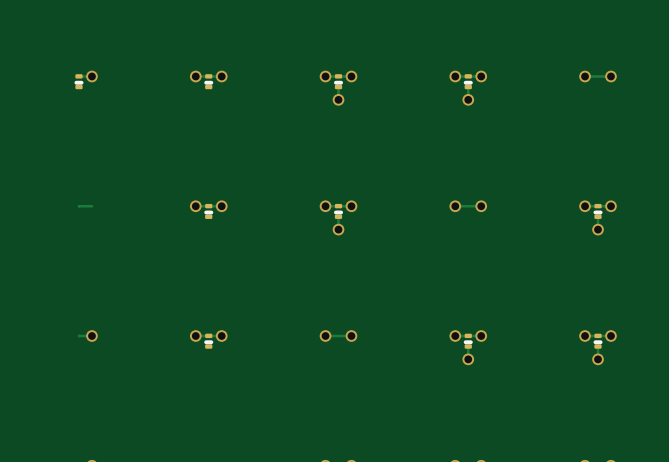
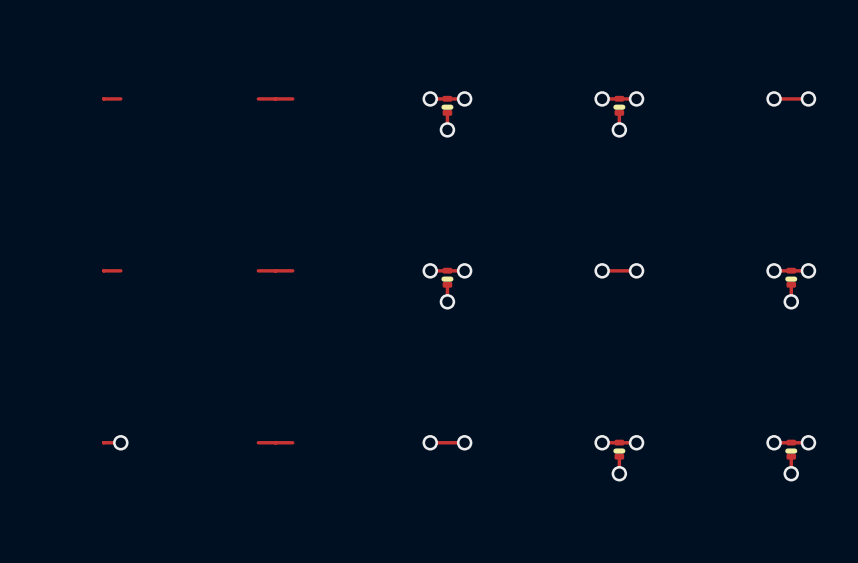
via: (91, 76) -> none
via: (195, 76) -> none
via: (221, 76) -> none
part: (78, 81) -> none
part: (208, 81) -> none
via: (195, 206) -> none
via: (221, 206) -> none
part: (208, 211) -> none
via: (195, 336) -> none
via: (221, 336) -> none
part: (208, 341) -> none

